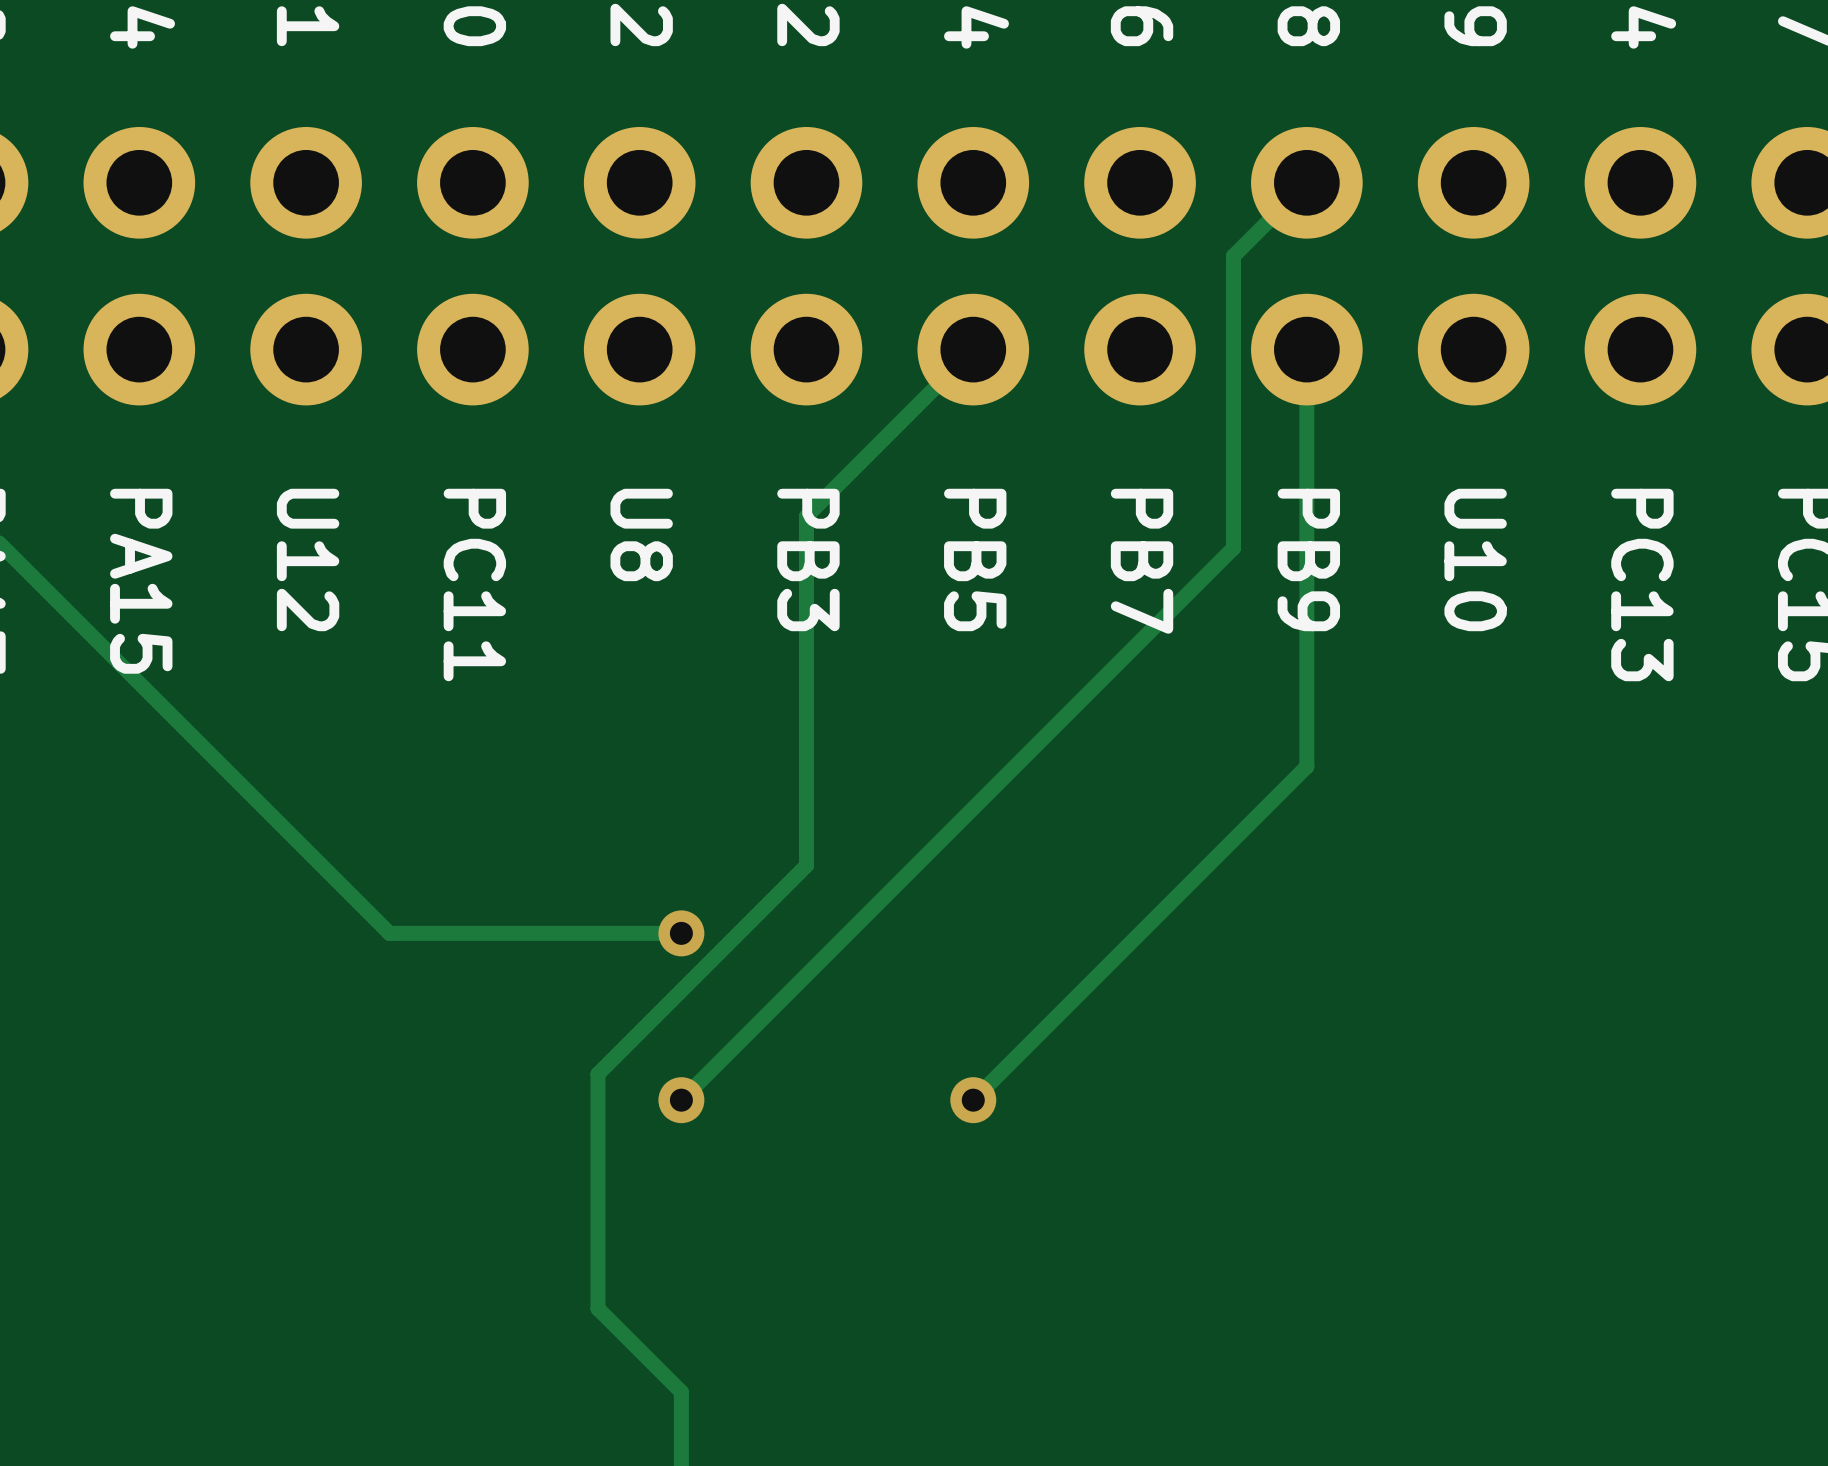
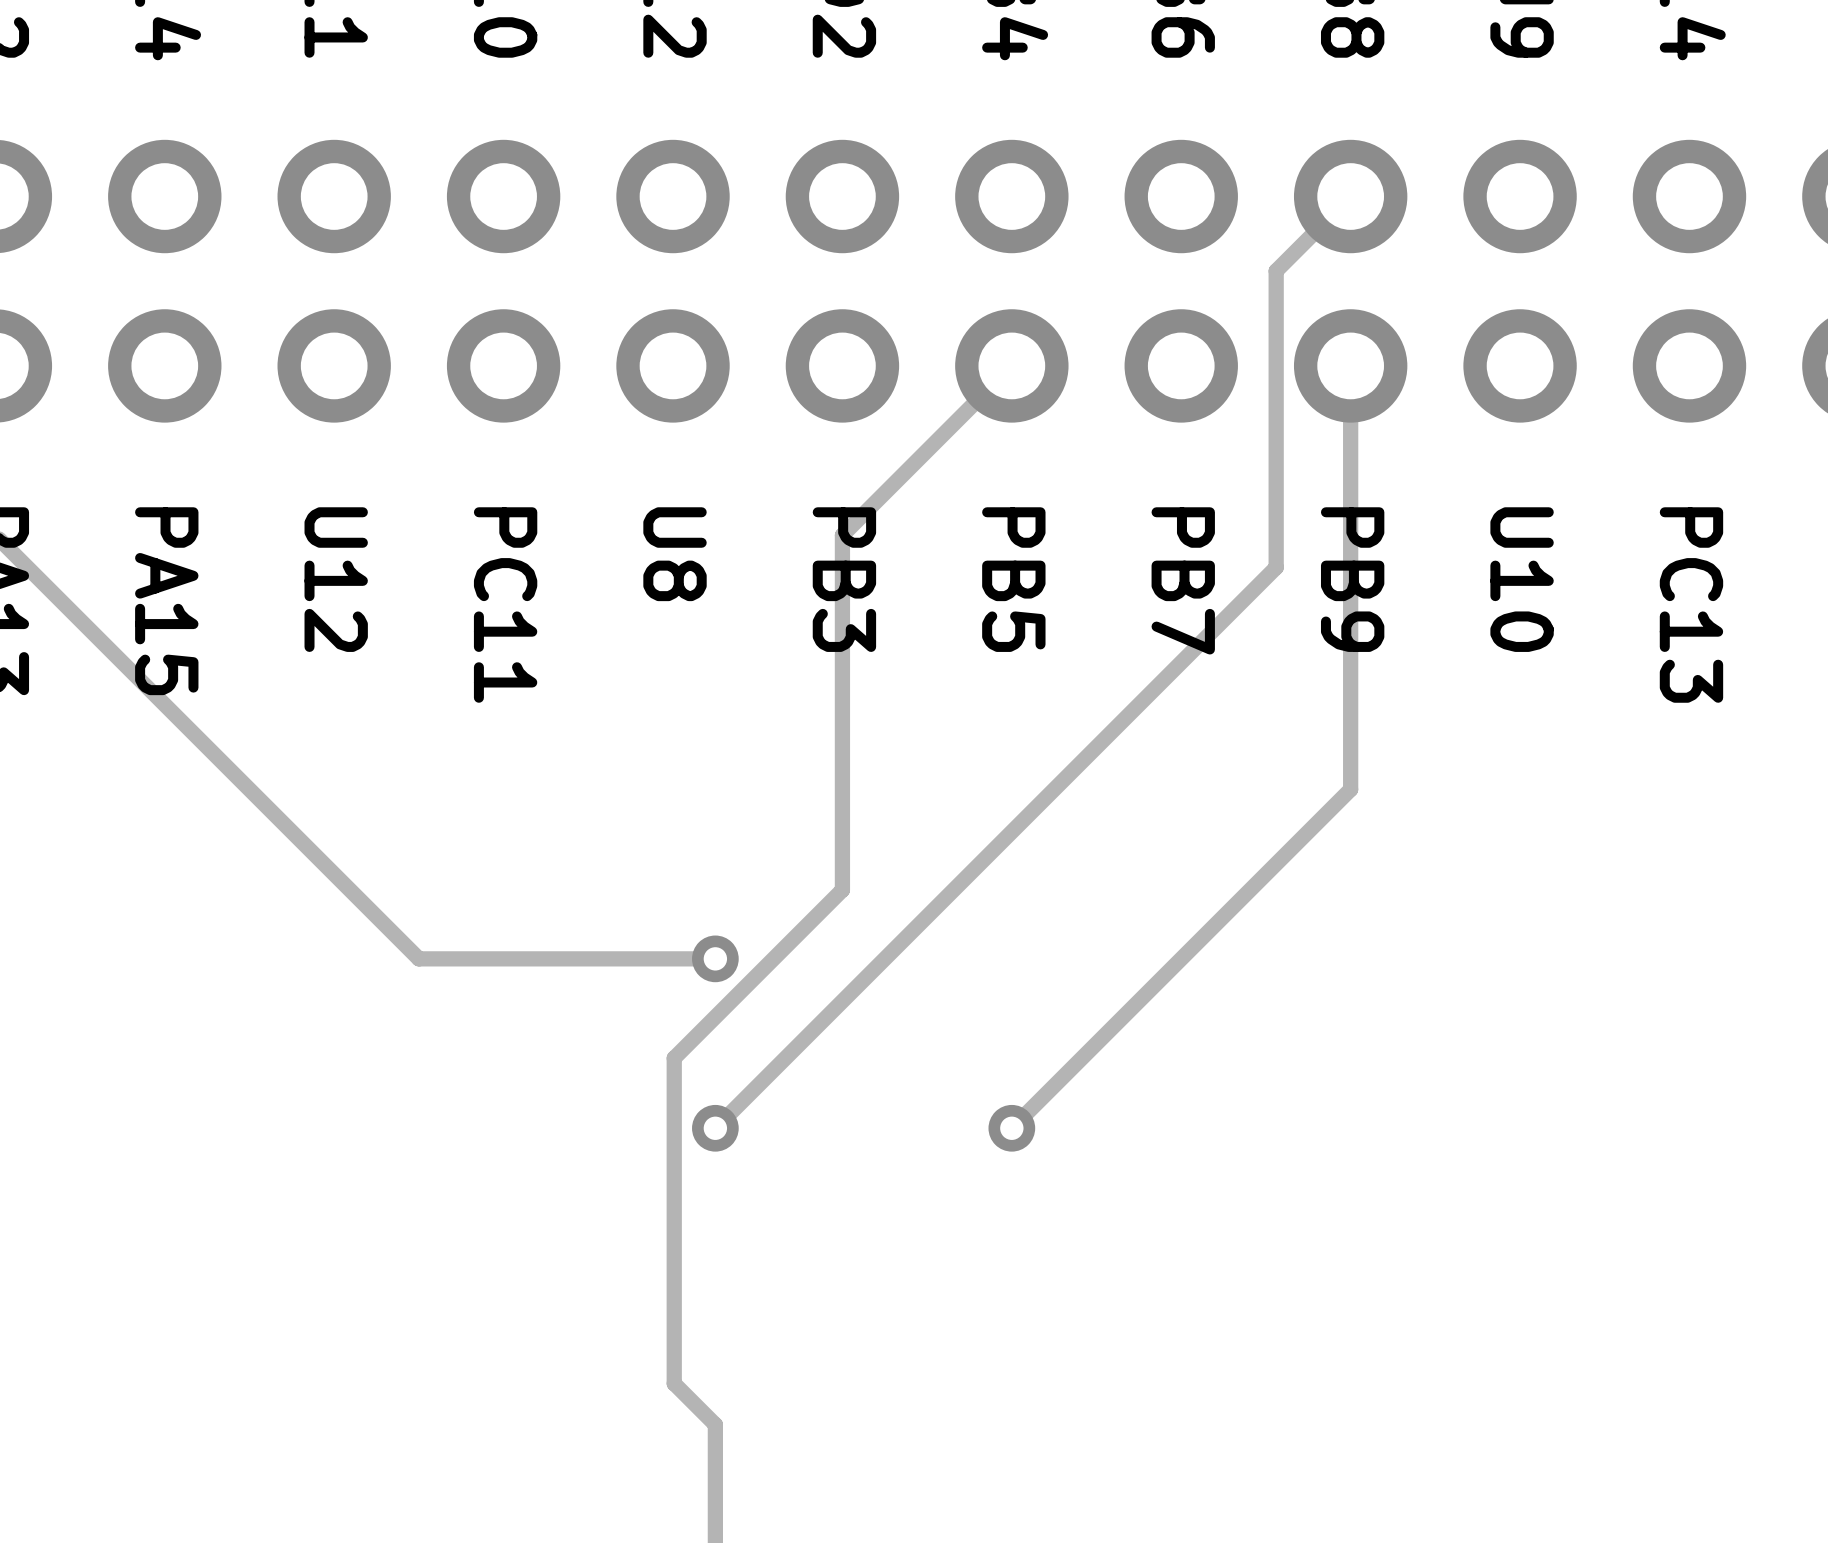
track: (640, 1031) (597, 1074) (597, 1308) (640, 1351) -> (674, 1058) (674, 1383)

